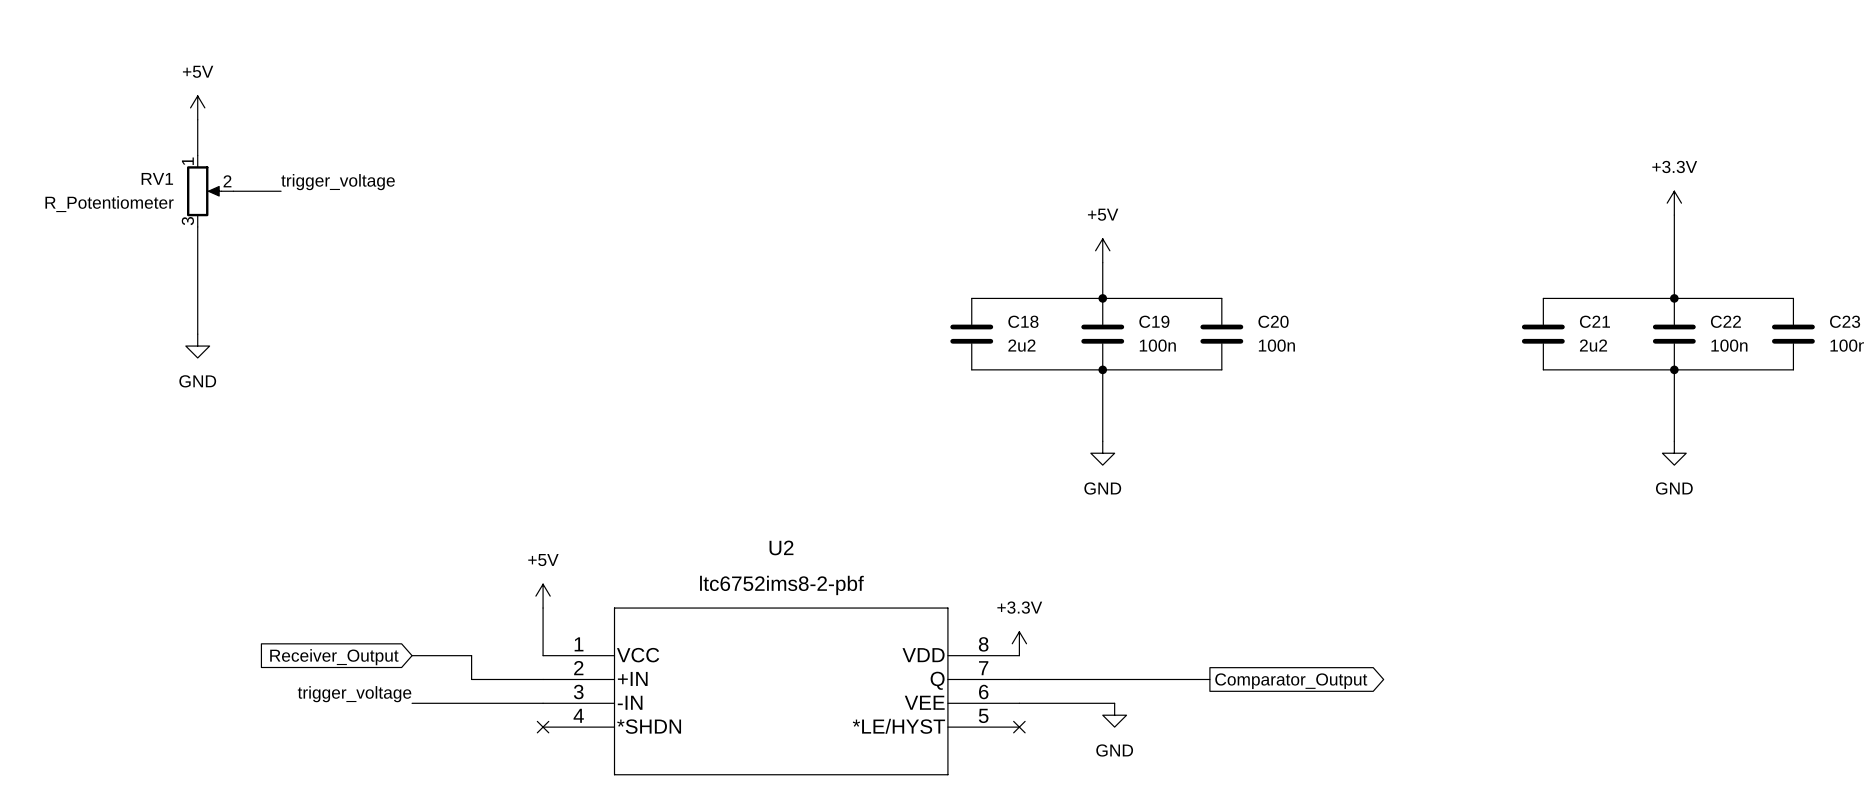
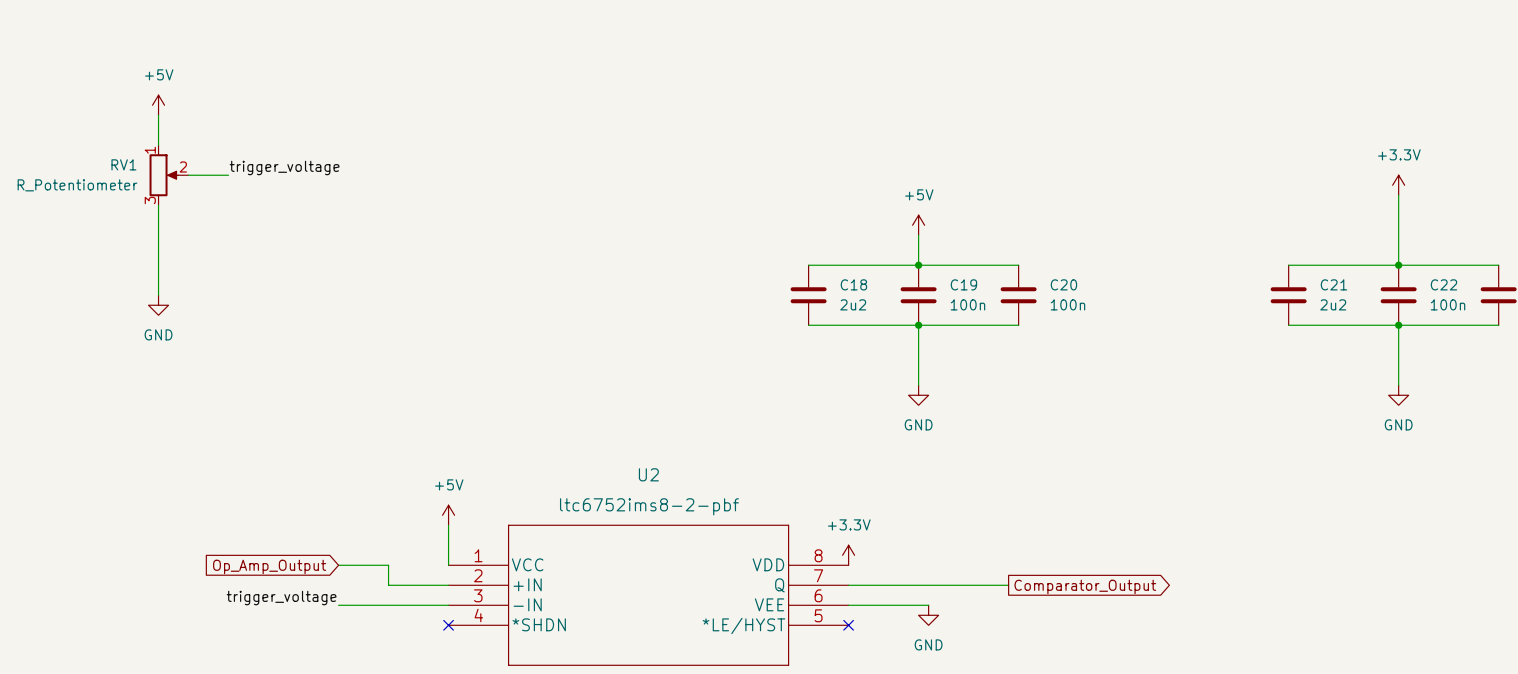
global label: Receiver_Output (334, 657) -> Op_Amp_Output (269, 566)

